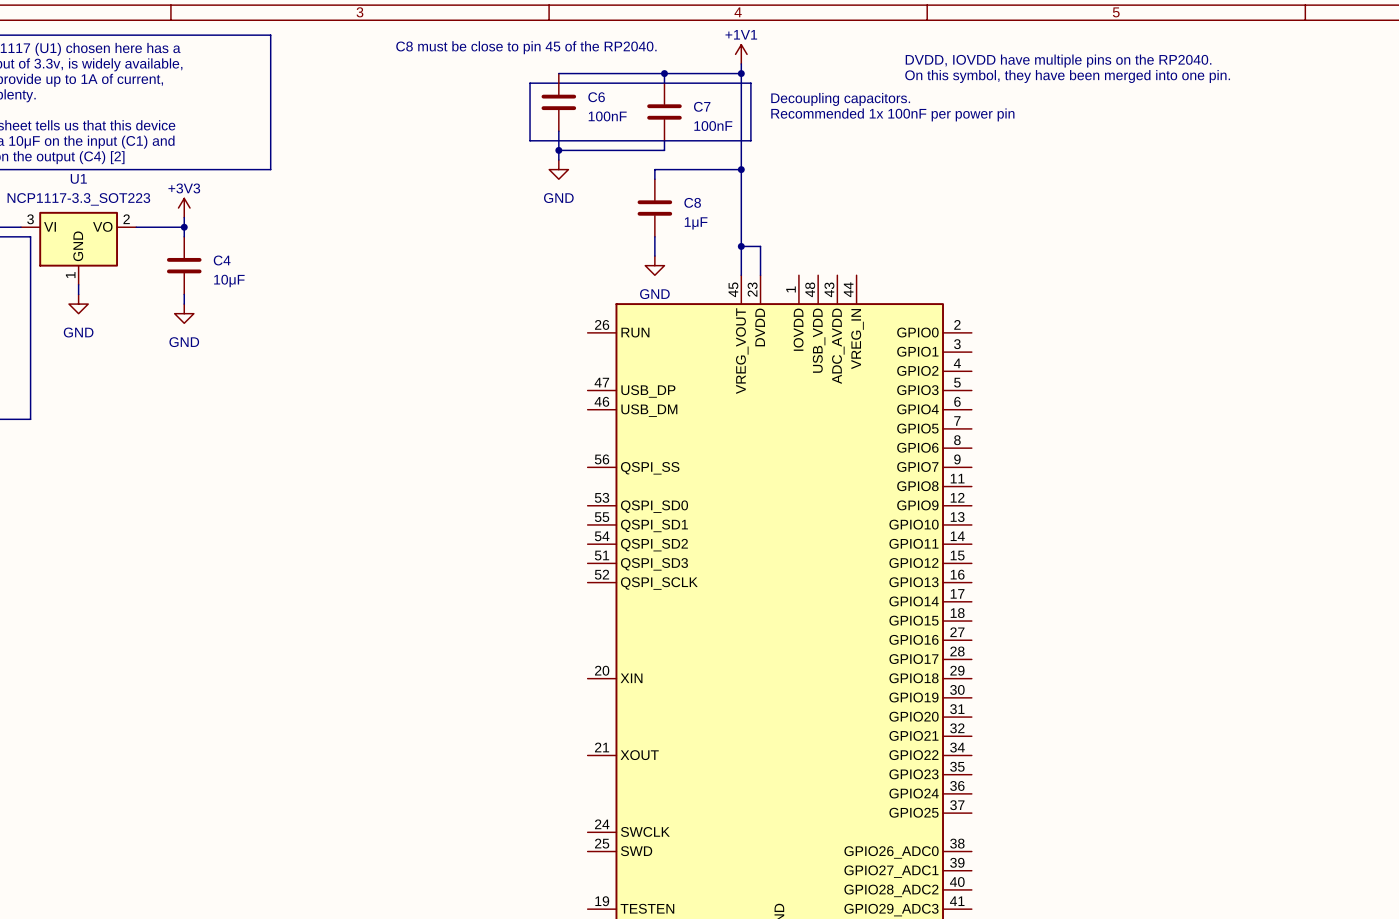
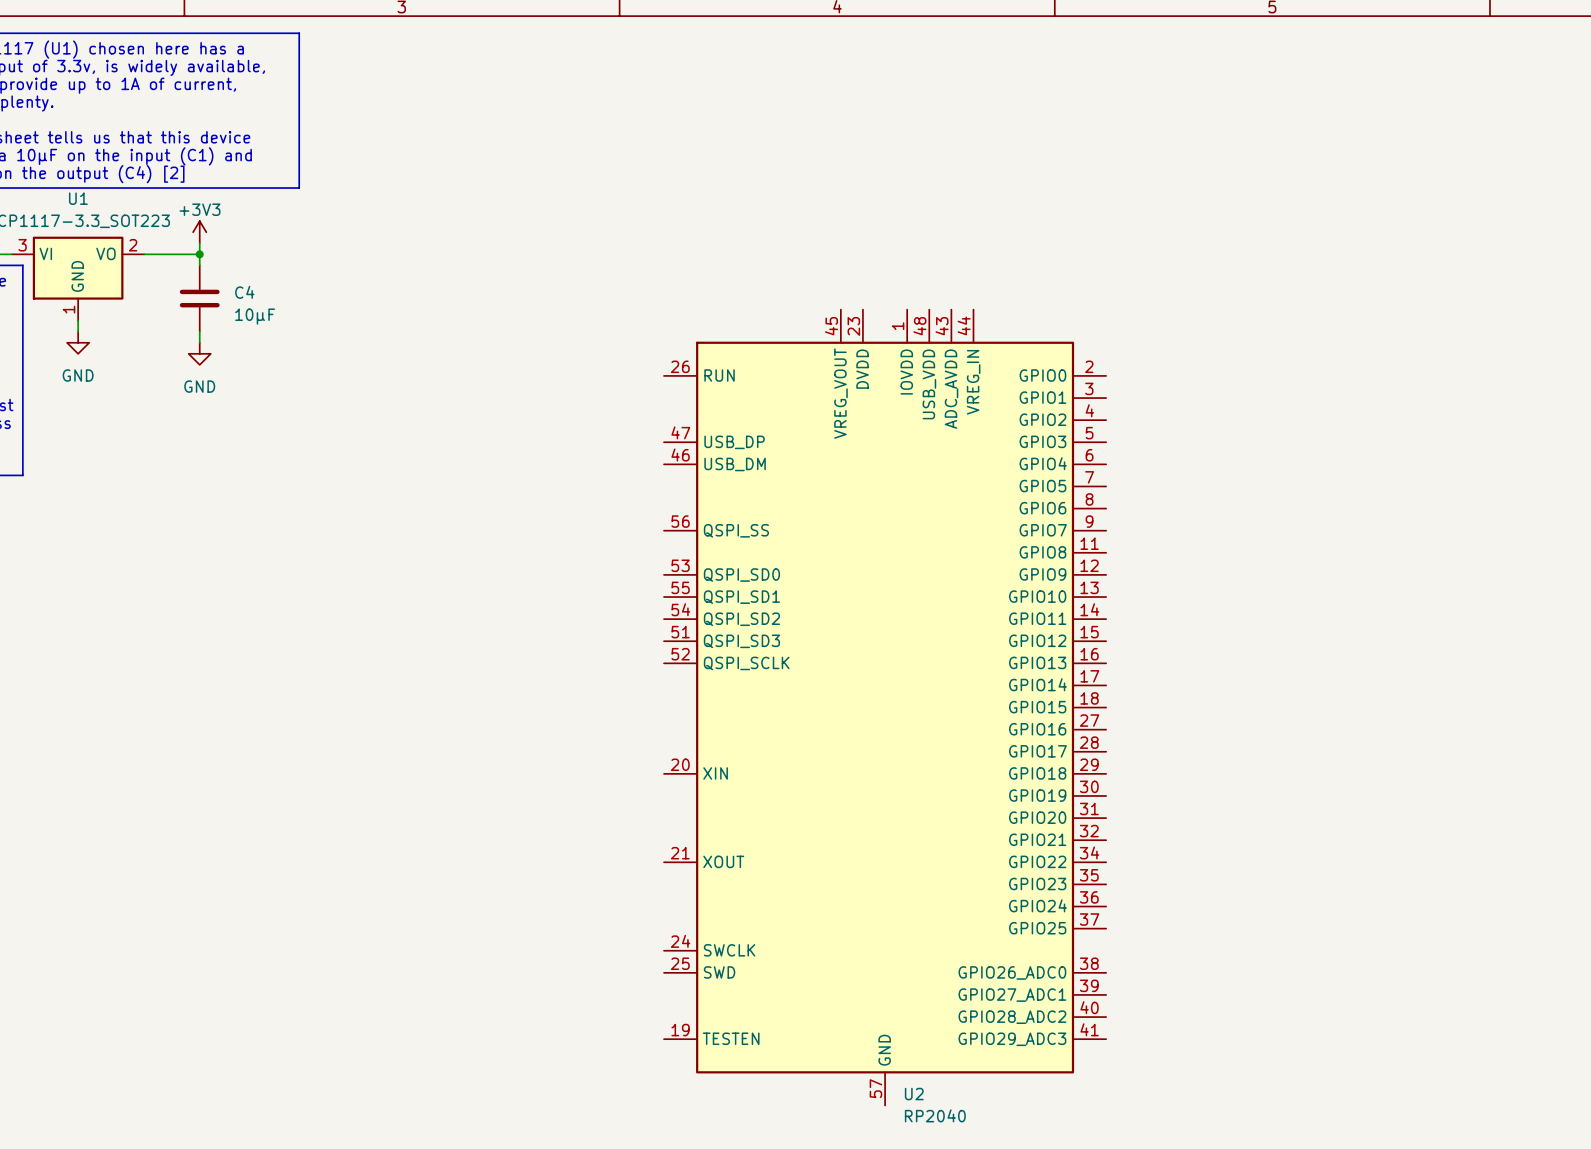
text: C8 must be close to pin 45 of the RP2040. (526, 47) -> none
power symbol: +1V1 (741, 54) -> none
text: DVDD, IOVDD have multiple pins on the RP2040. (1058, 61) -> none
wire: (741, 63) (741, 275) -> none
wire: (558, 73) (741, 73) -> none
wire: (664, 73) (664, 83) -> none
junction: (664, 73) -> none
junction: (741, 73) -> none
text: On this symbol, they have been merged into one pin. (1067, 76) -> none
line: (530, 83) (750, 83) (750, 140) (530, 140) (530, 83) -> none
text: Decoupling capacitors. (840, 99) -> none
C6: 100nF (558, 102) -> none
C7: 100nF (664, 111) -> none
text: Recommended 1x 100nF per power pin (892, 114) -> none
wire: (558, 131) (558, 160) -> none
wire: (664, 140) (664, 150) (558, 150) -> none
junction: (558, 150) -> none
power symbol: GND (558, 169) -> none
wire: (741, 169) (654, 169) (654, 179) -> none
junction: (741, 169) -> none
C8: 1μF (654, 208) -> none
wire: (654, 236) (654, 256) -> none
wire: (741, 246) (760, 246) (760, 275) -> none
junction: (741, 246) -> none
power symbol: GND (654, 265) -> none

